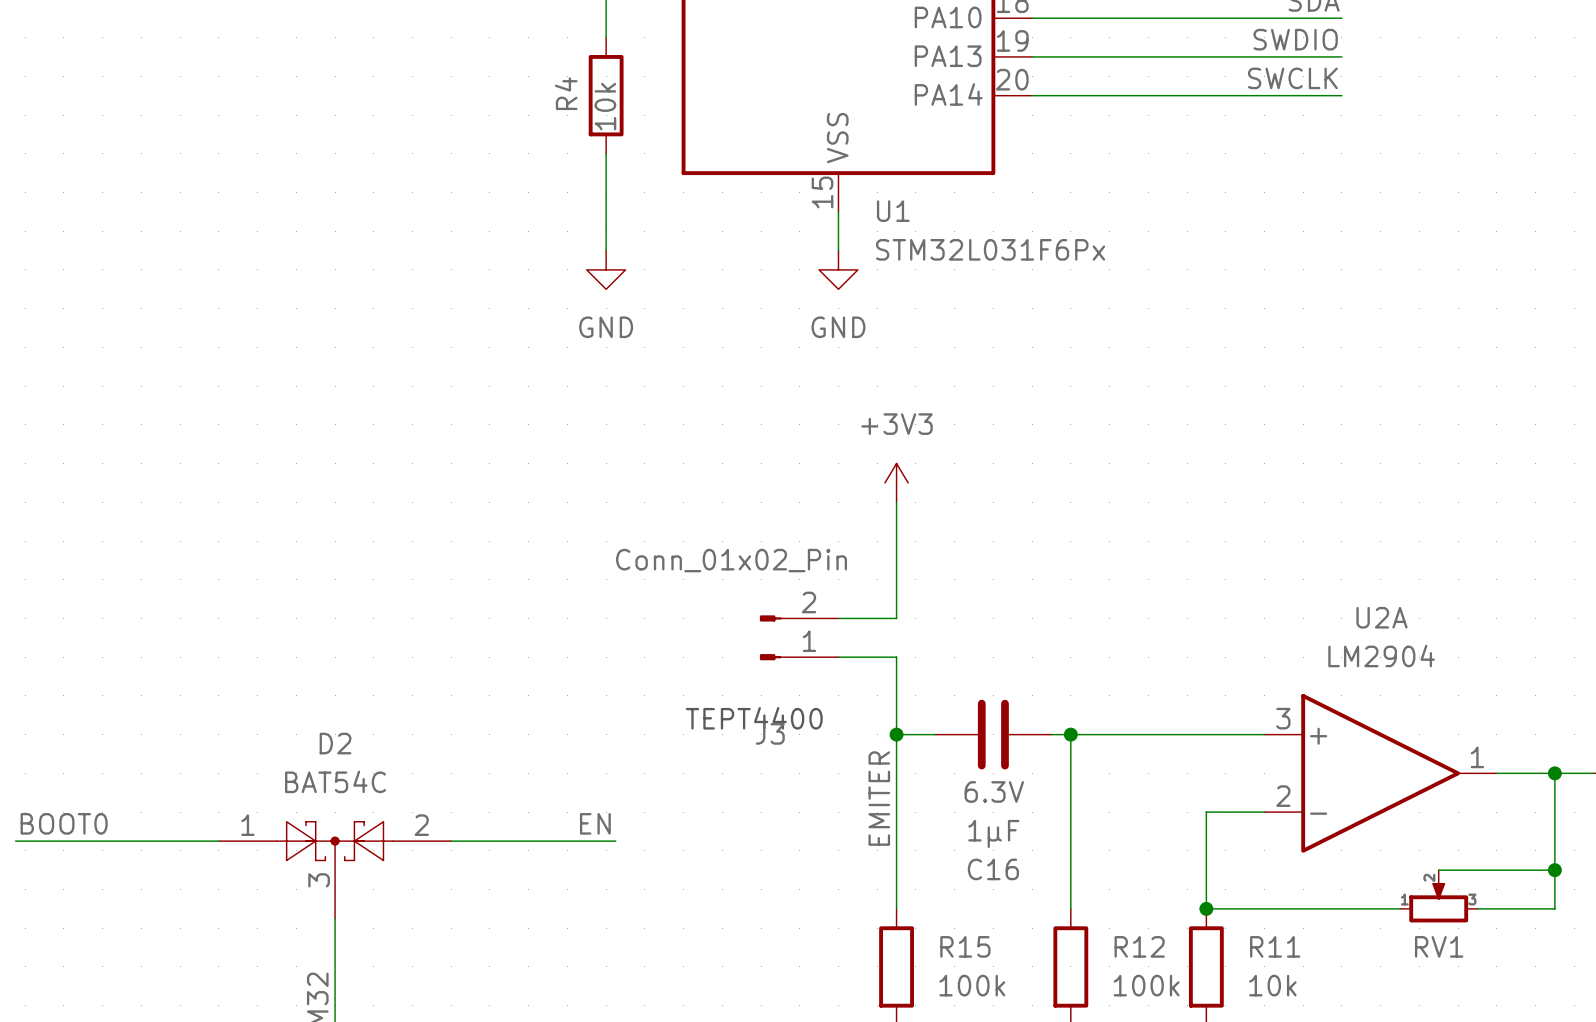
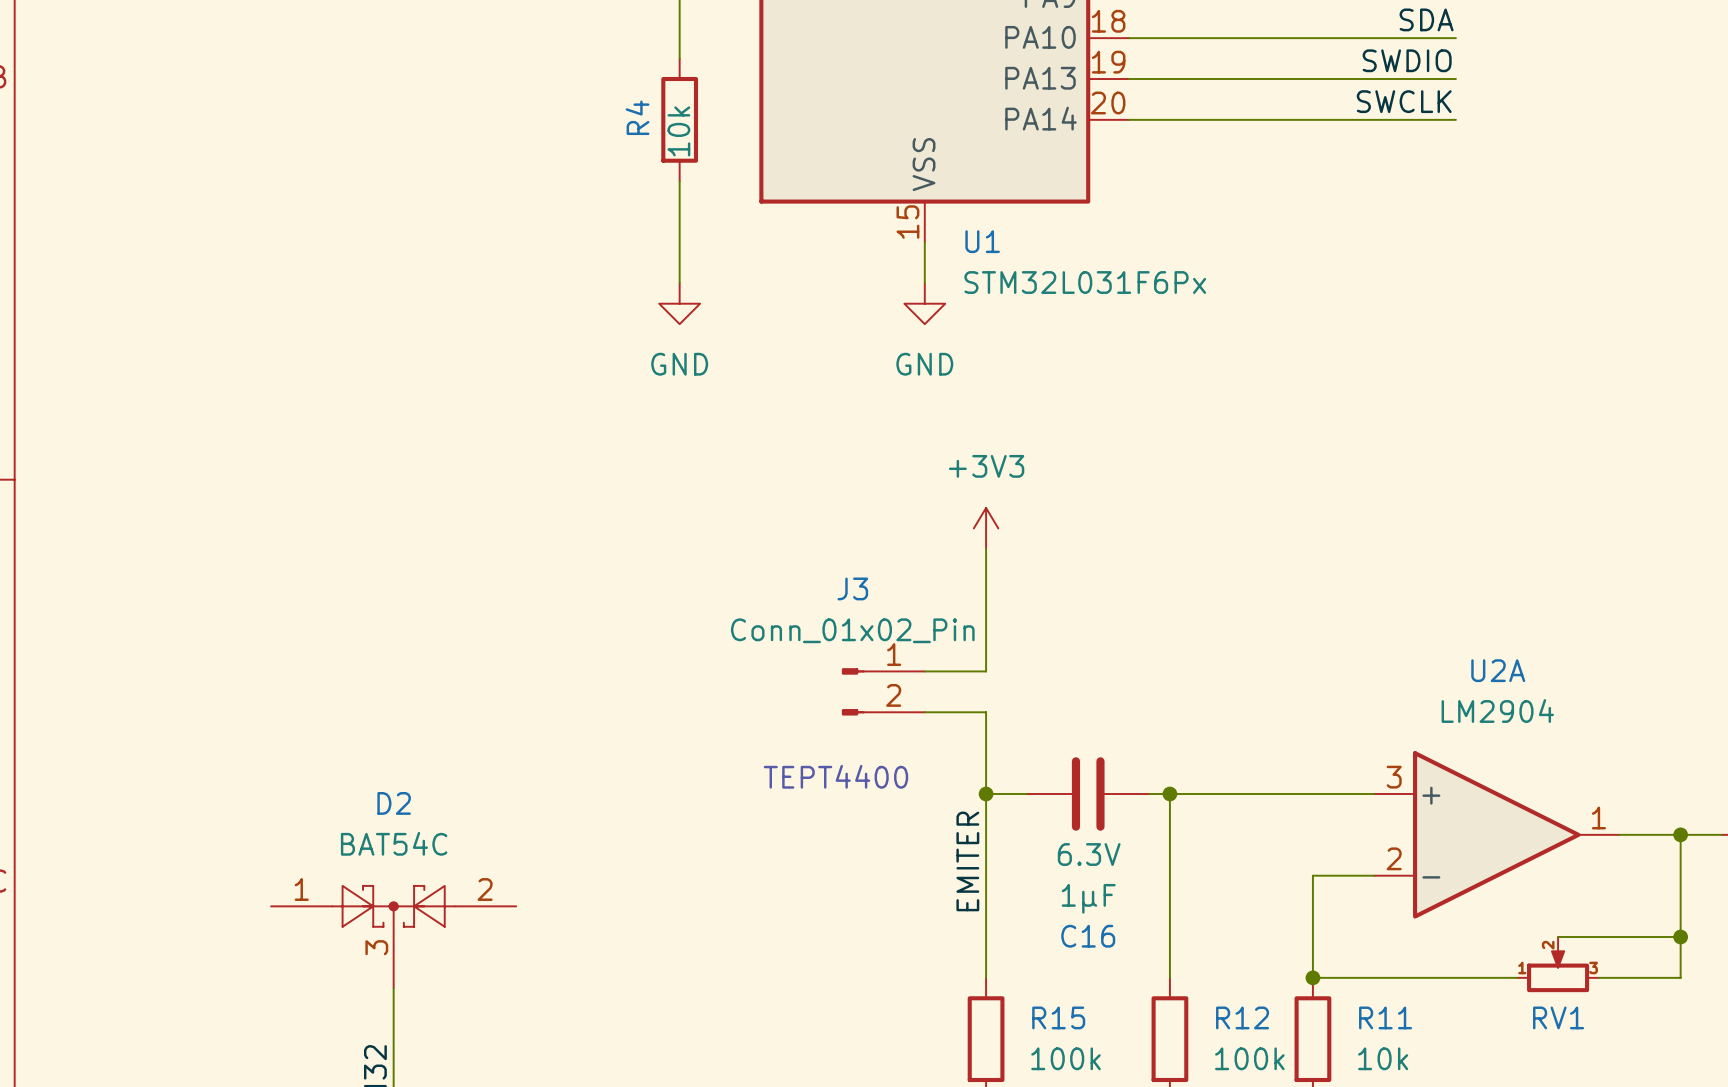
J3 value position: Conn_01x02_Pin (731, 560) -> Conn_01x02_Pin (852, 630)
J3 flip: as is (770, 637) -> up-down (853, 691)
label: BOOT0 (64, 823) -> none
label: EN (595, 823) -> none
wire: (15, 841) (218, 841) -> none
wire: (451, 841) (615, 841) -> none

